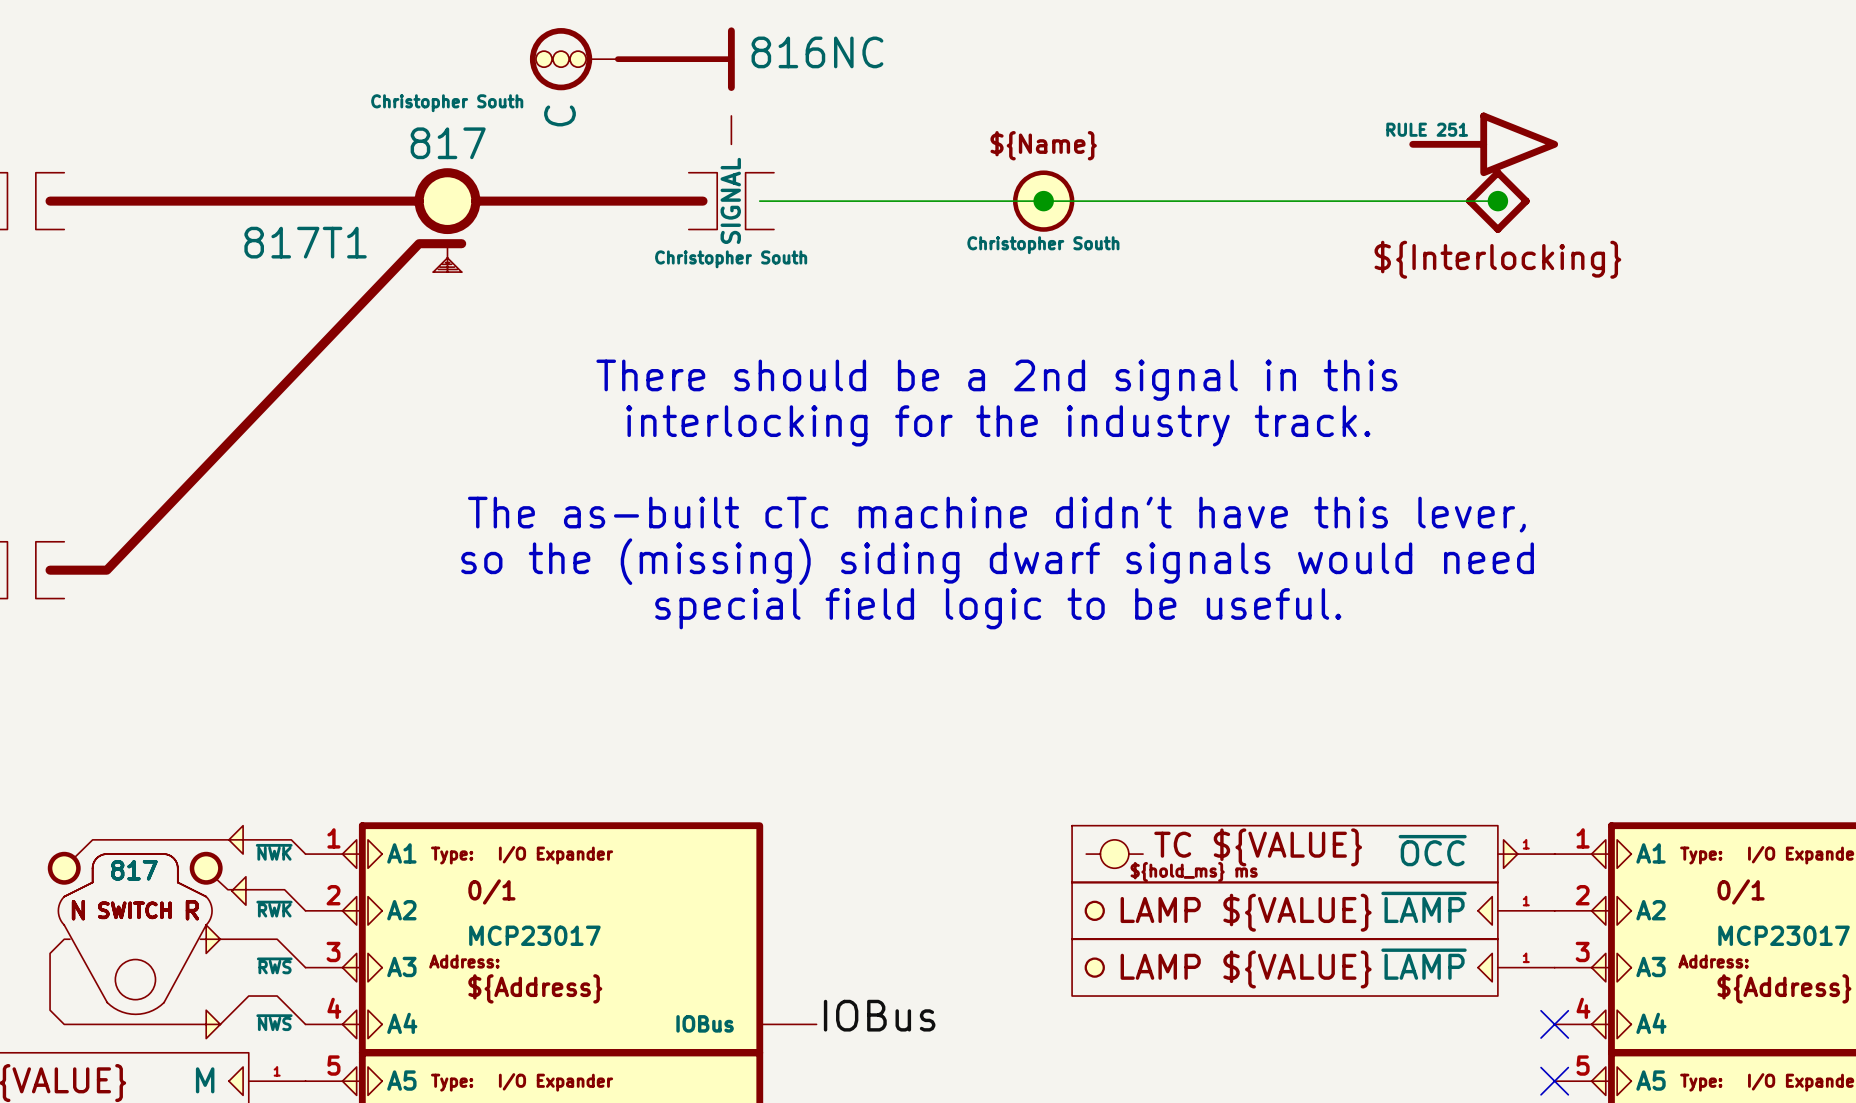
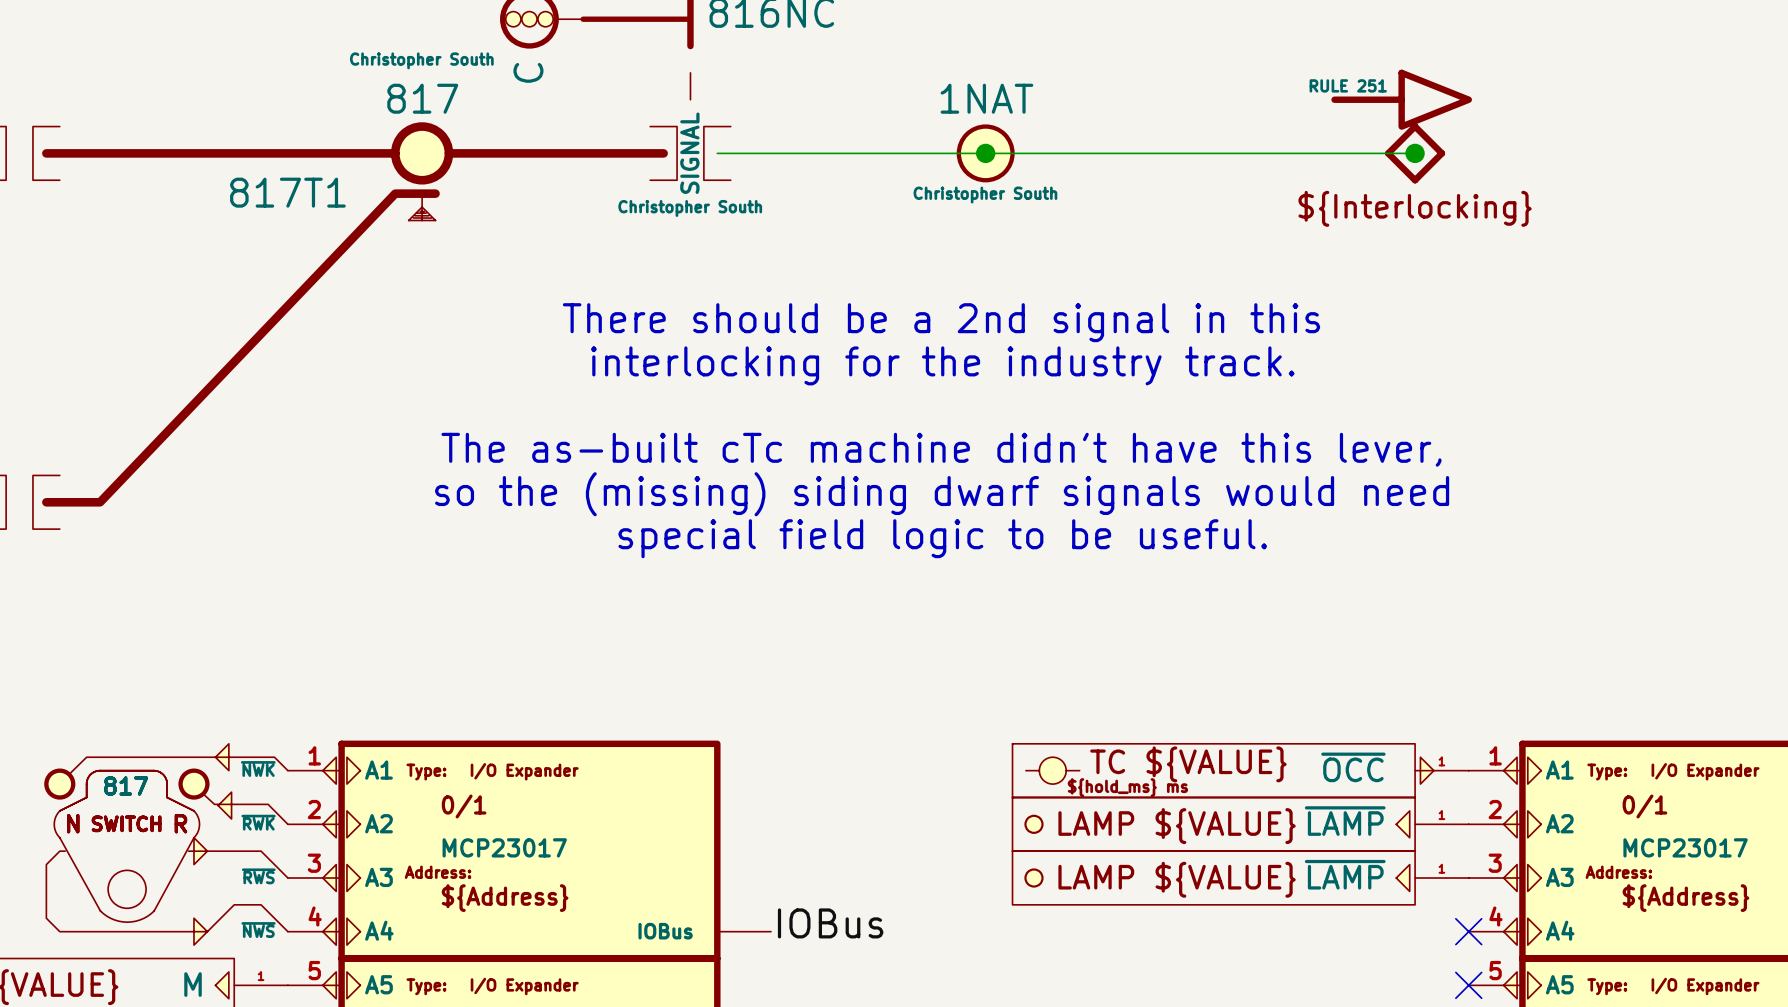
part value: none -> 1NAT (986, 98)
part text: ${Name} (1043, 145) -> none

